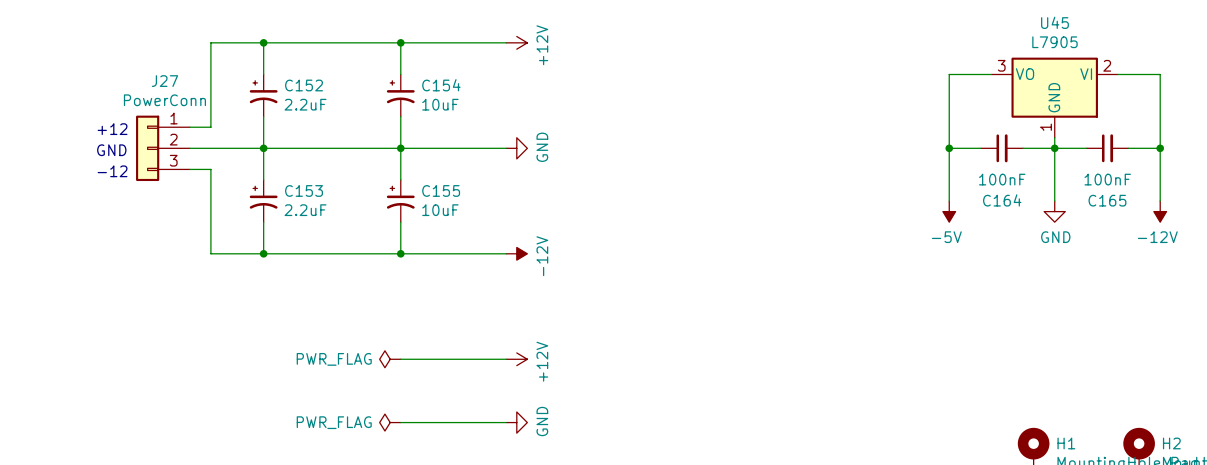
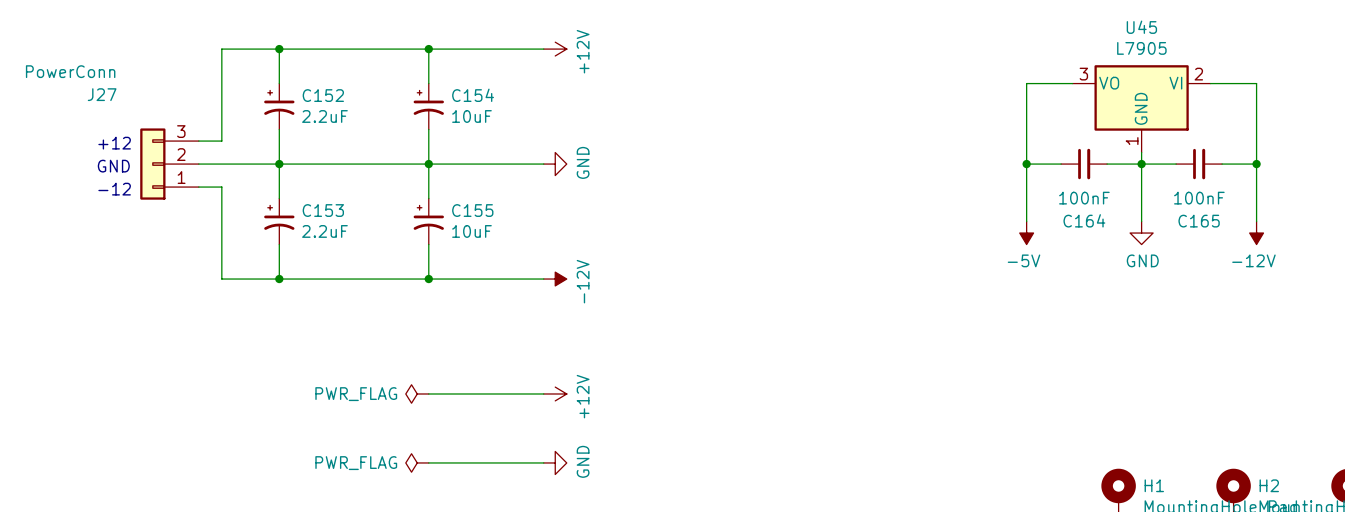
J27 name position: J27 (164, 81) -> J27 (102, 94)
J27 value position: PowerConn (164, 100) -> PowerConn (70, 71)
J27 flip: as is (147, 148) -> up-down (152, 164)

